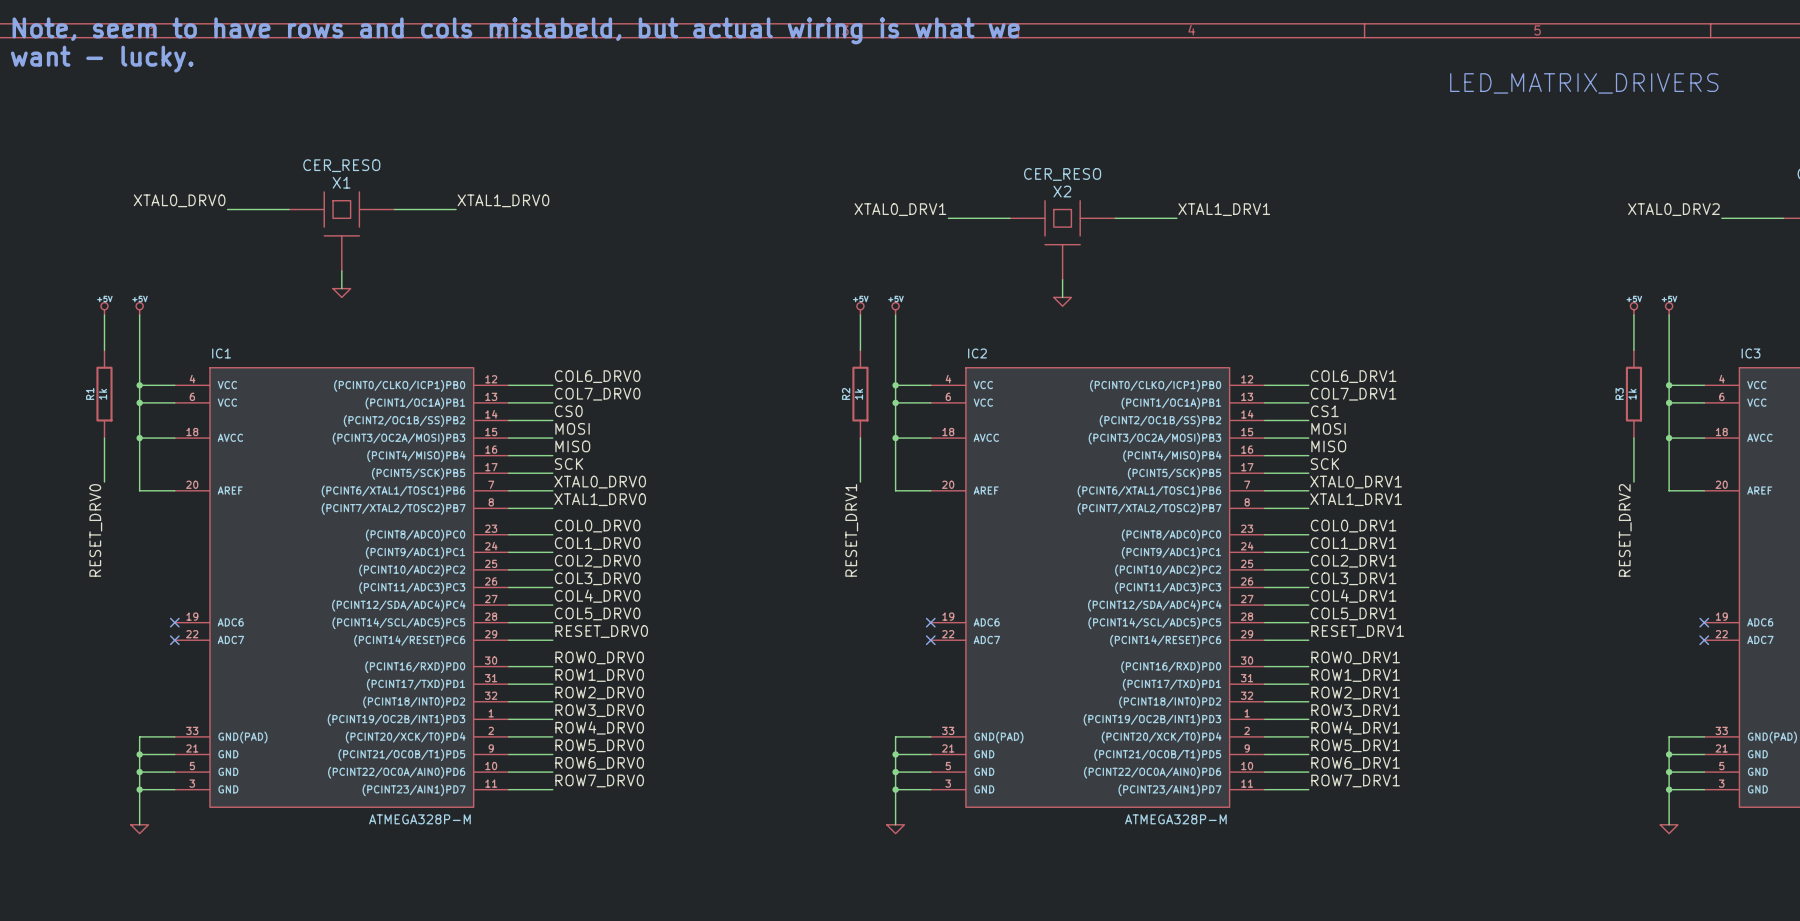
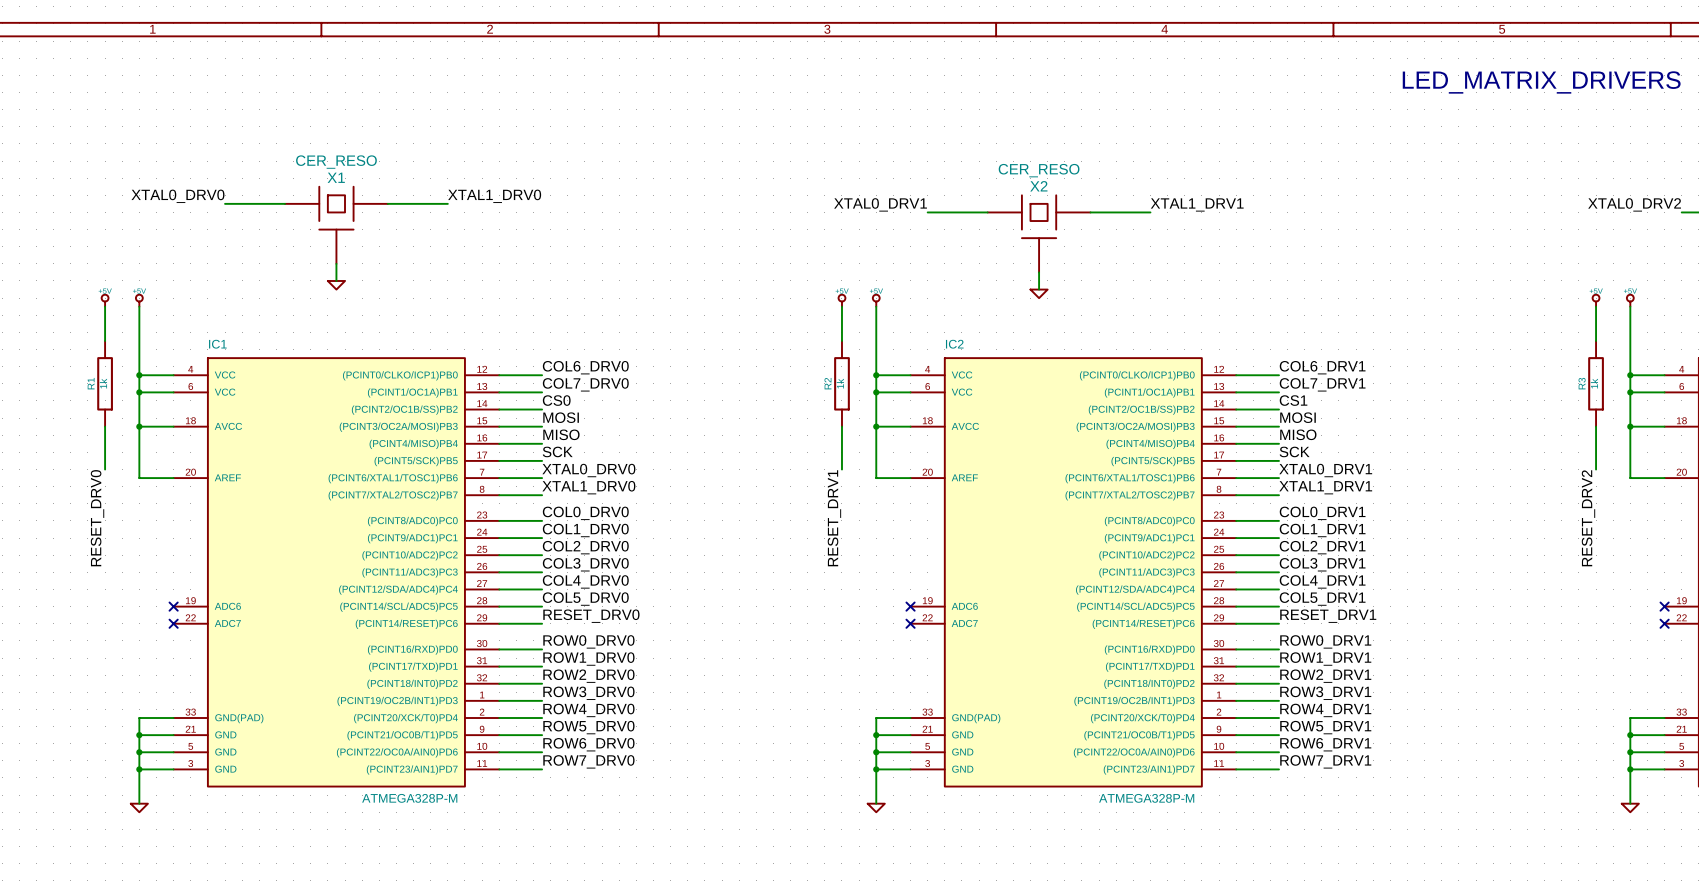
text: Note, seem to have rows and cols mislabeld, but actual wiring is what we (516, 30) -> none
text: want - lucky. (102, 59) -> none

